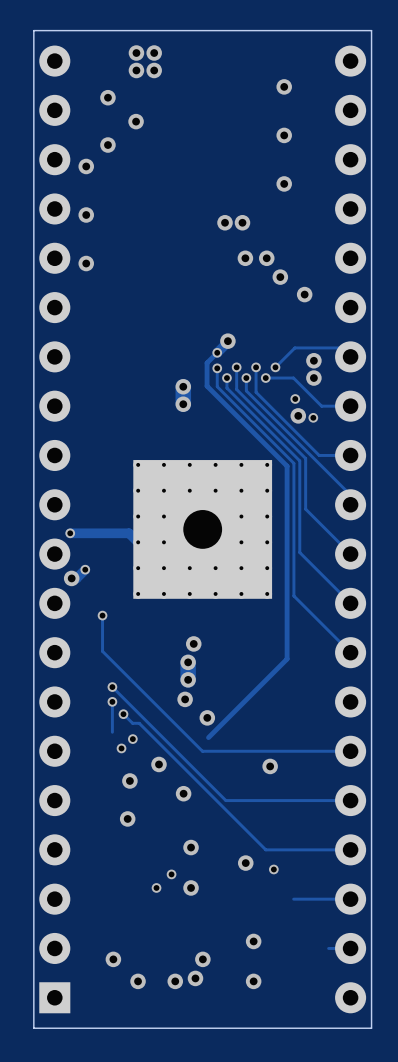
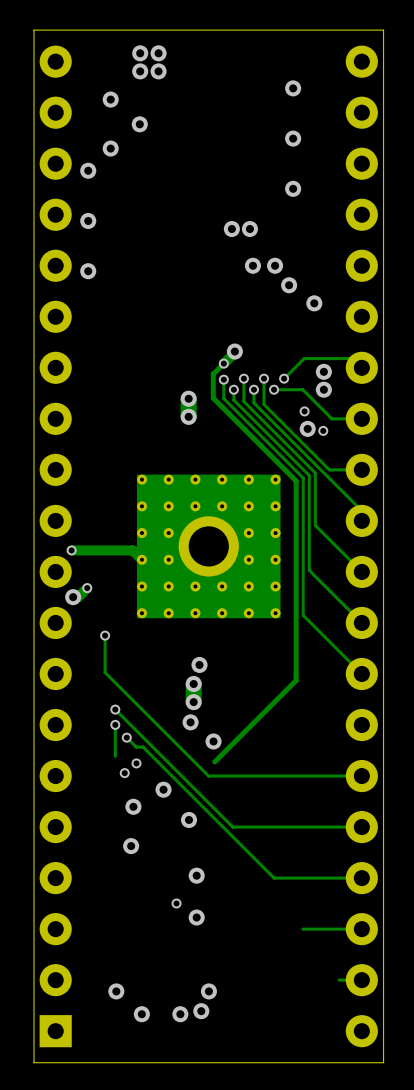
via: (270, 766) -> none
via: (245, 863) -> none
via: (273, 869) -> none
via: (156, 887) -> none
via: (253, 941) -> none
via: (253, 981) -> none

